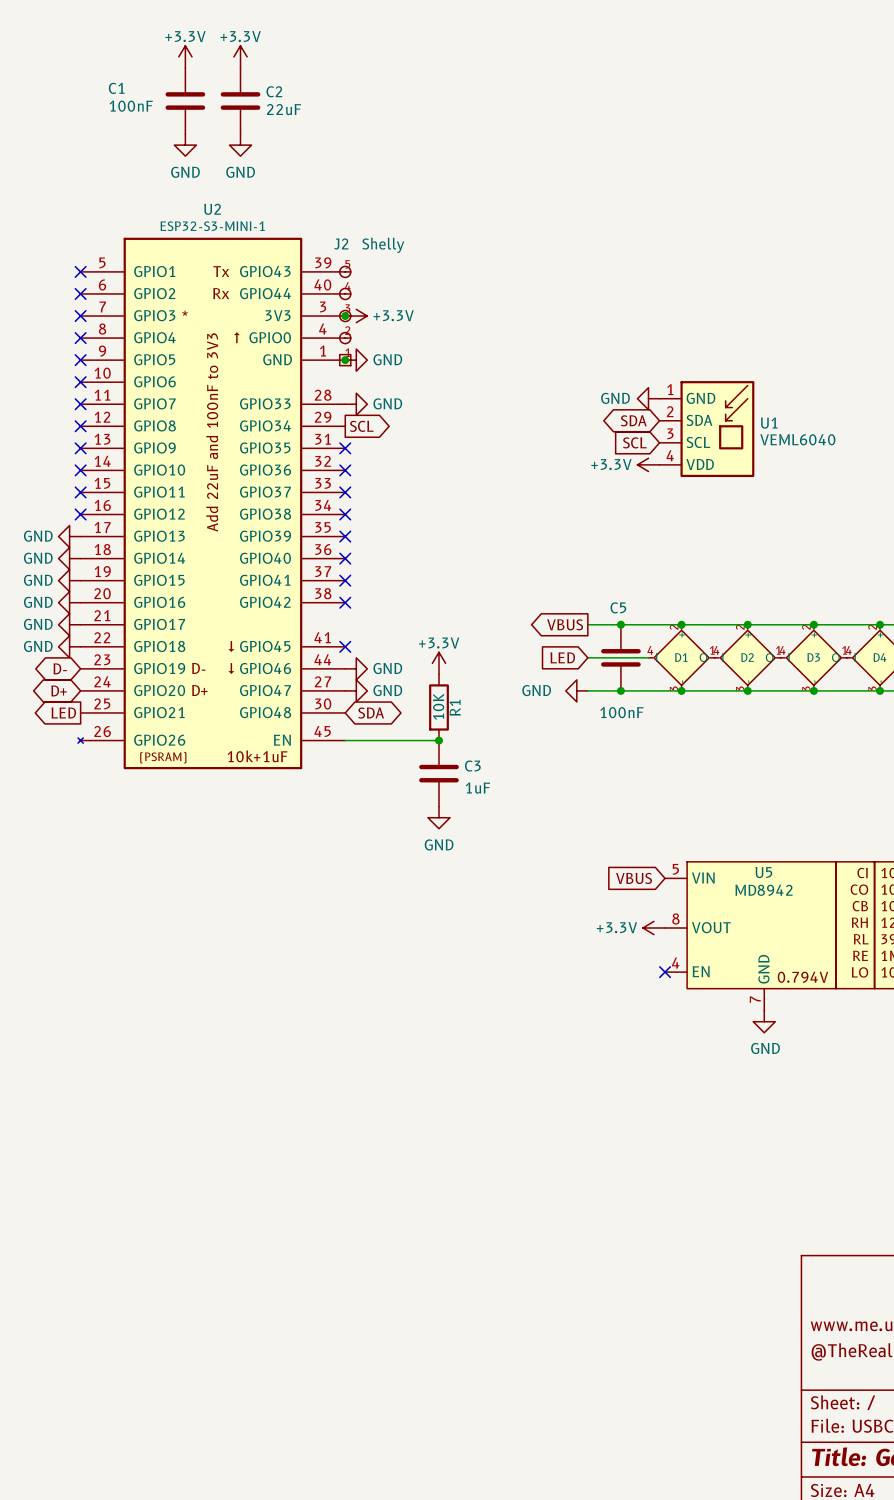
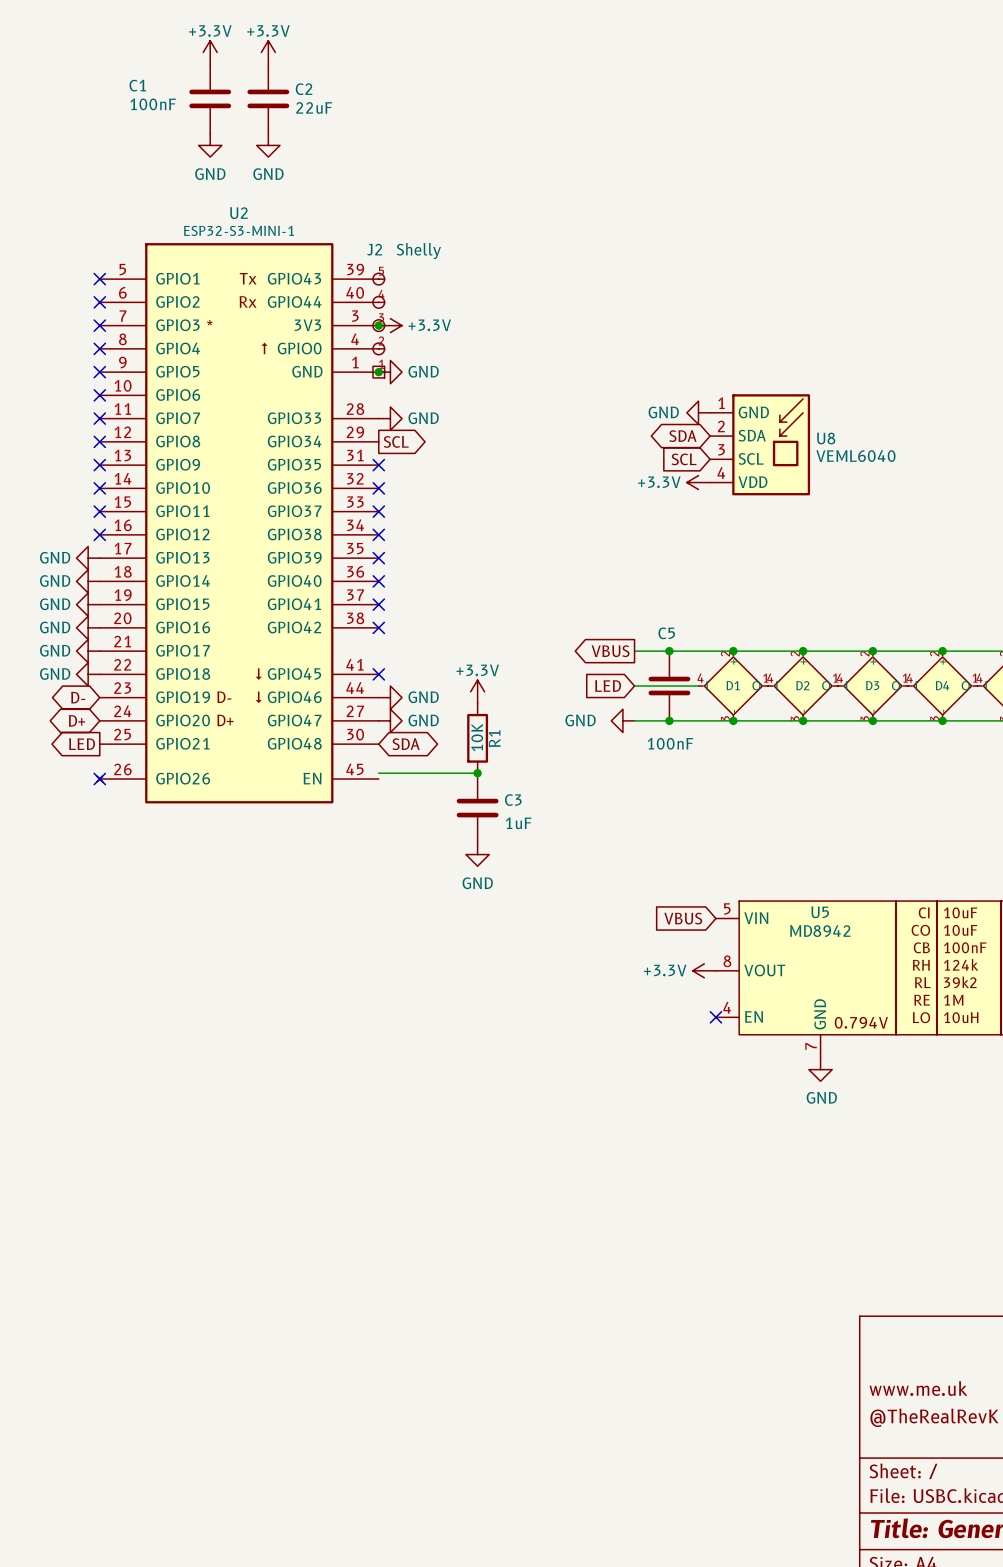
U2 symbol: [78, 237, 346, 770] -> [97, 243, 379, 804]
U1 name: U1 (769, 423) -> U8 (826, 438)
no-connect mark: none -> (99, 779)

